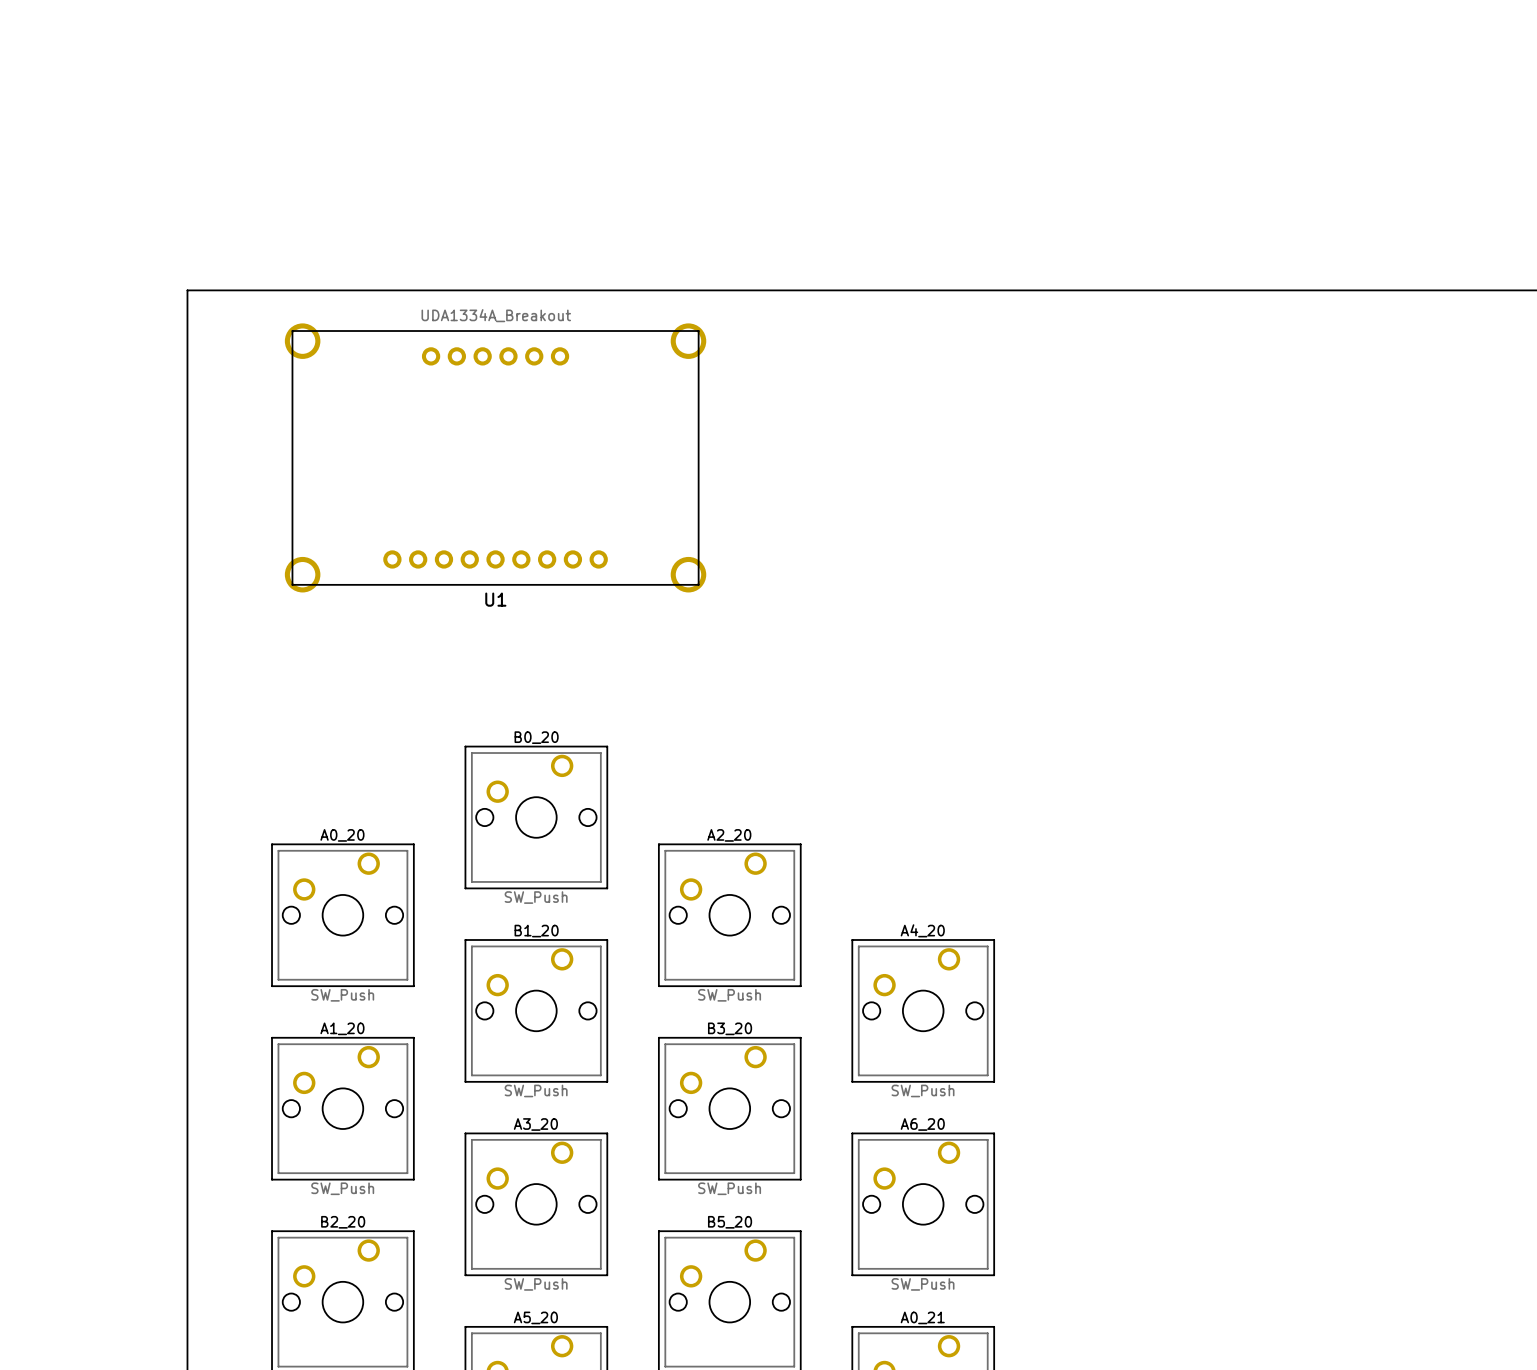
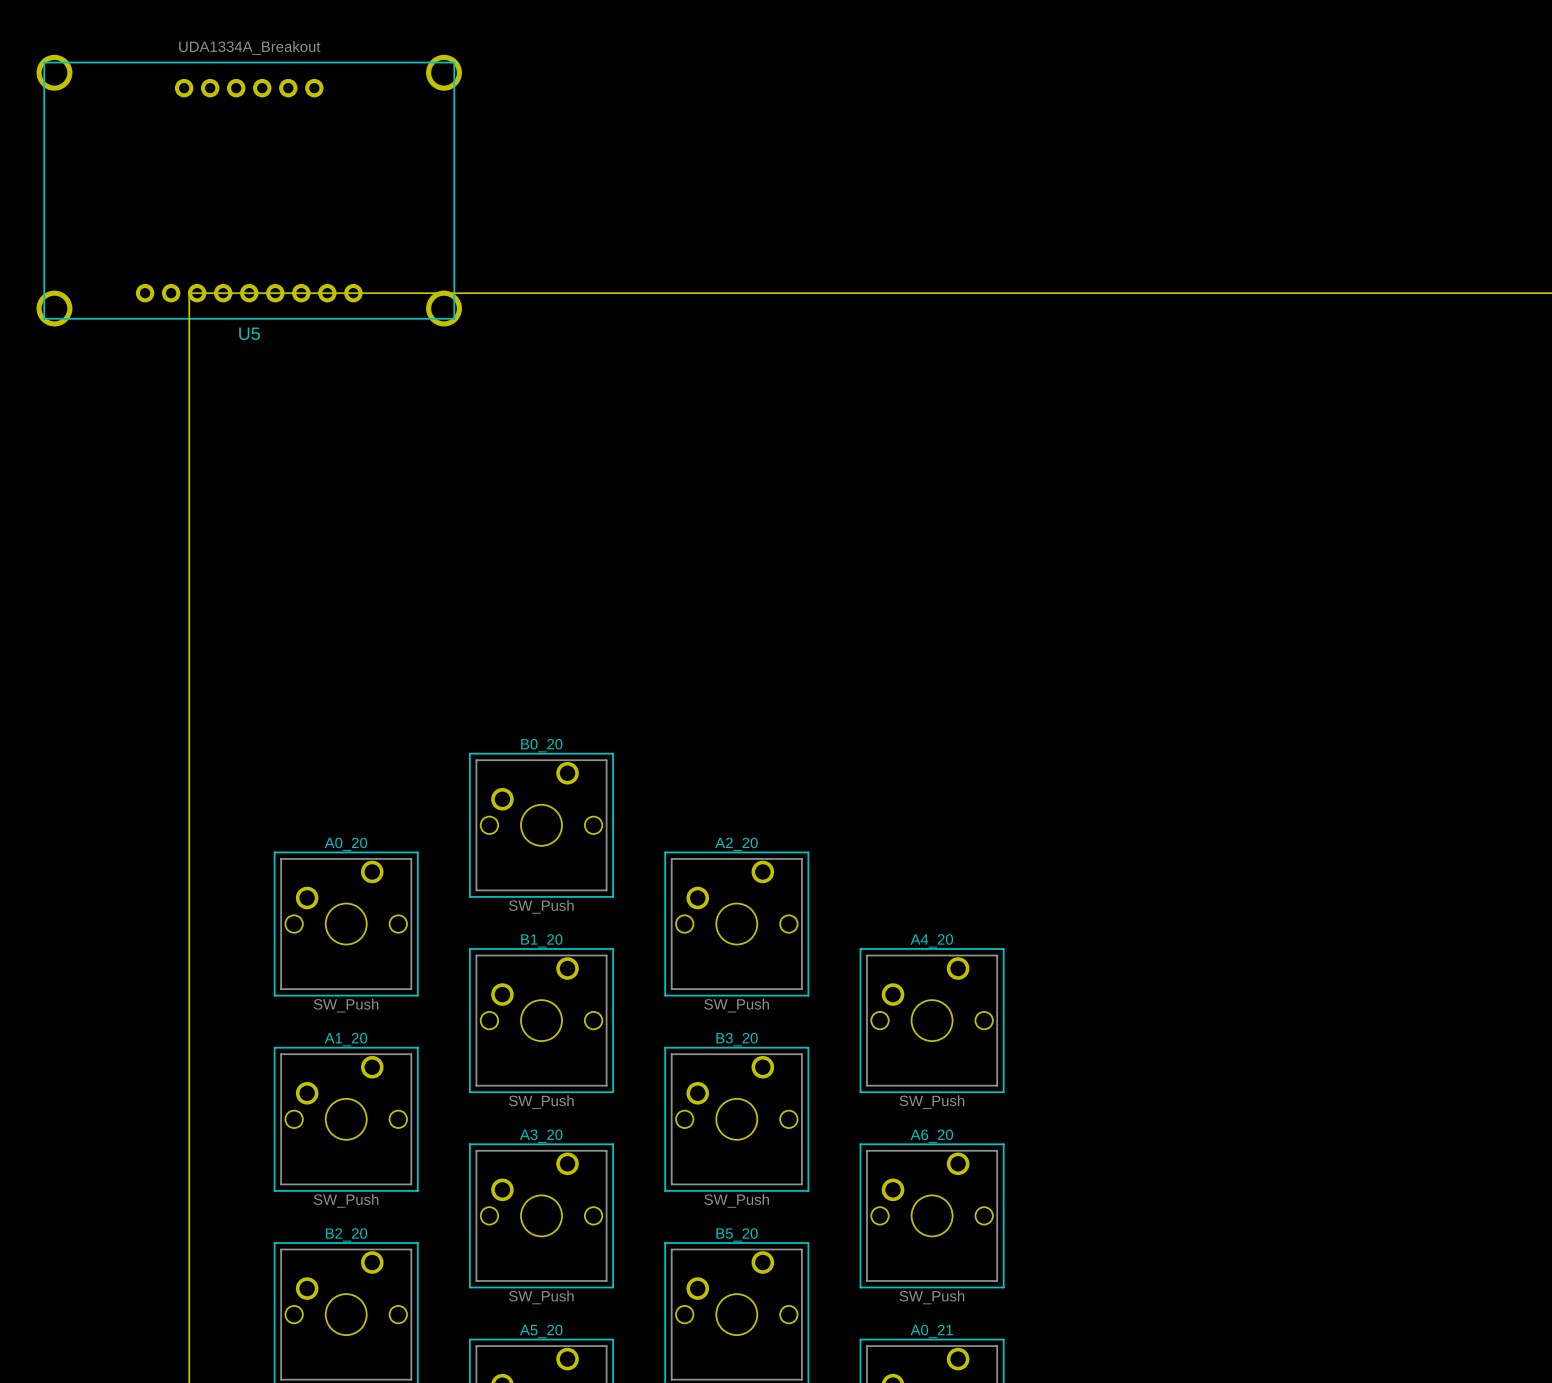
U5: none -> UDA1334A_Breakout (249, 190)
U1: UDA1334A_Breakout (495, 457) -> none

